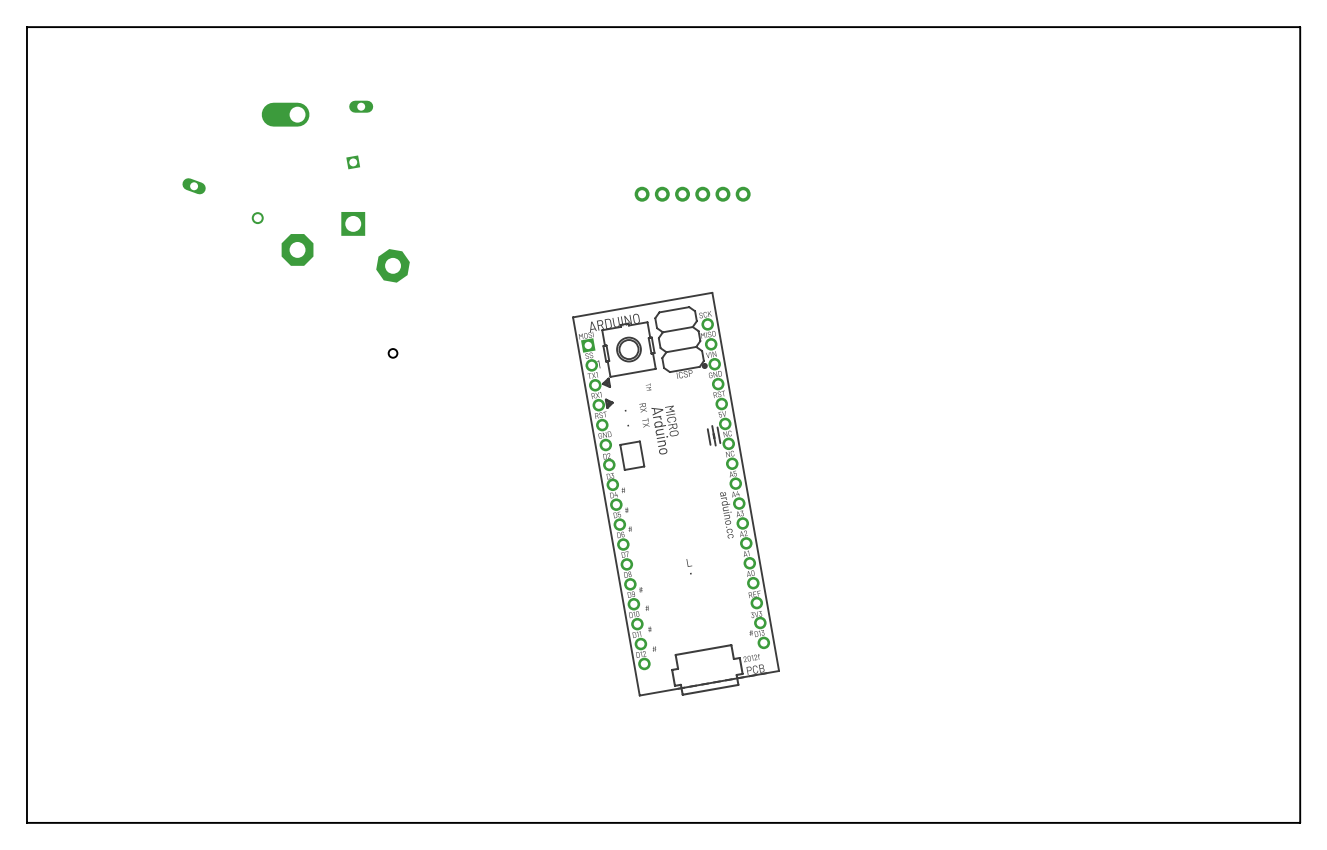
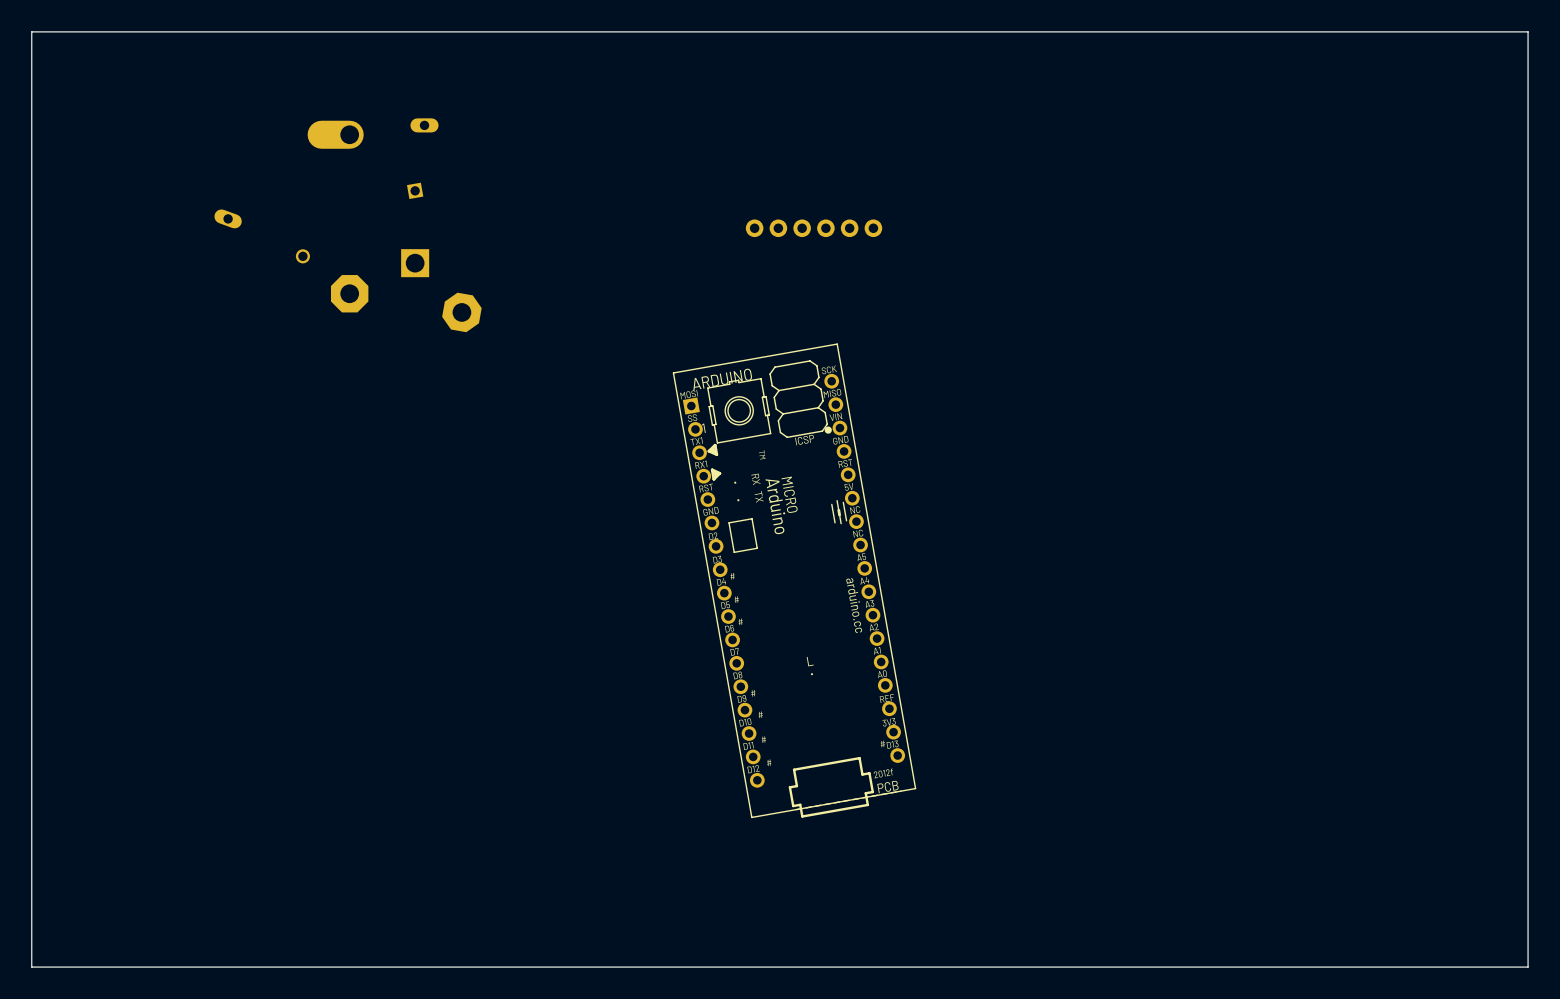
part: (393, 353) -> none

